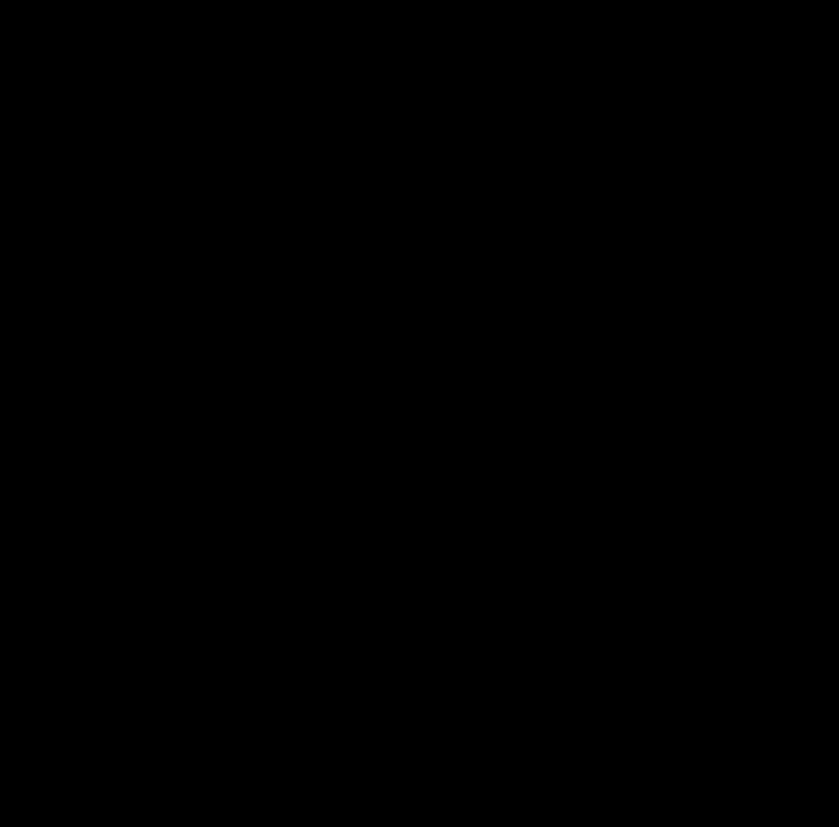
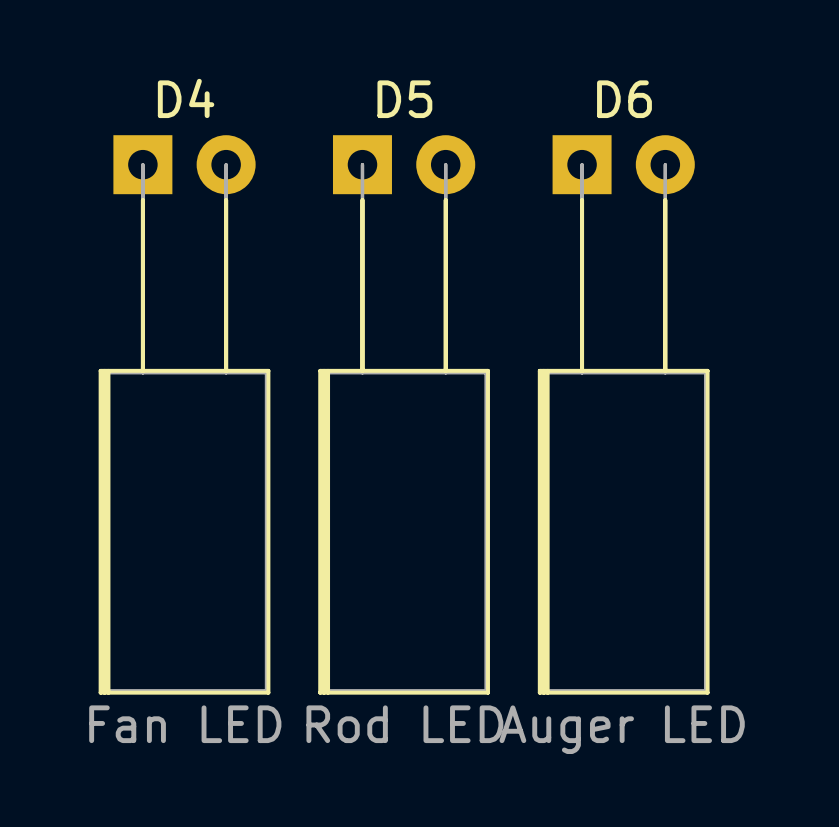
D4: none -> Fan LED (184, 414)
D5: none -> Rod LED (404, 414)
D6: none -> Auger LED (623, 414)

